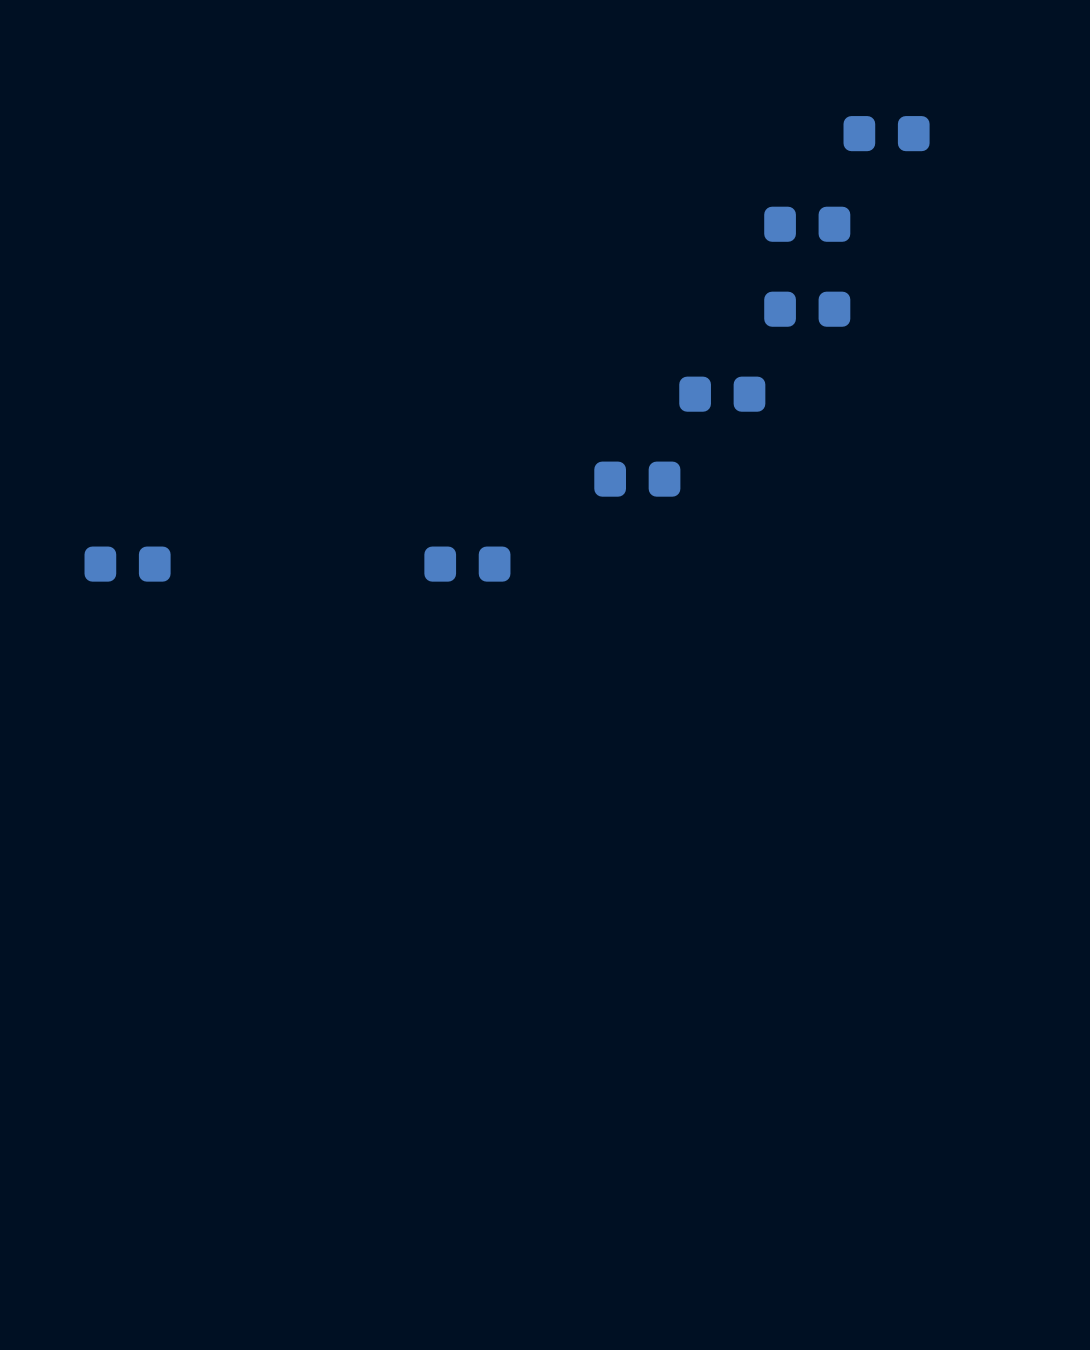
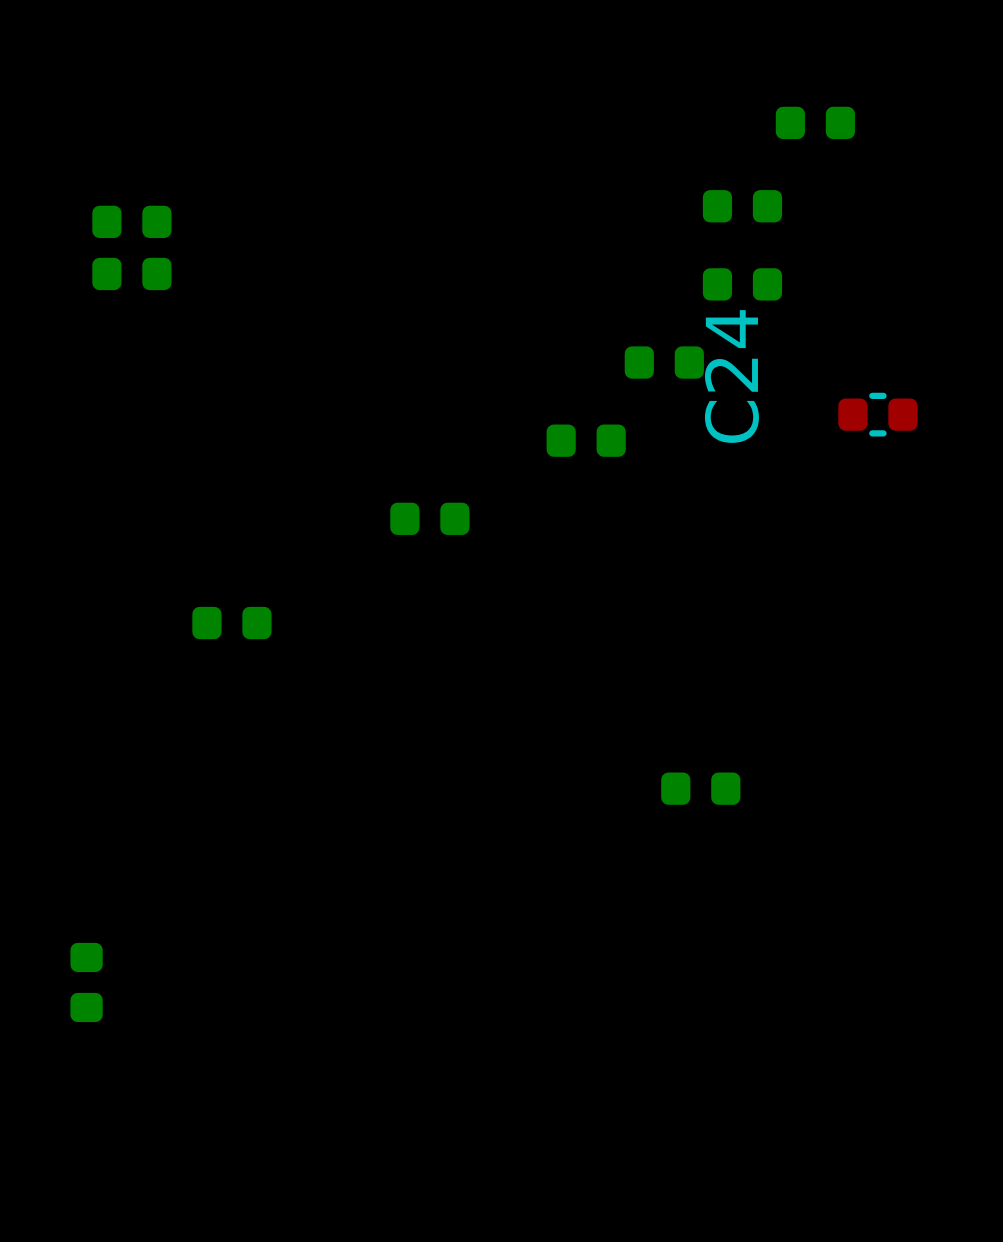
part: none -> (131, 221)
part: none -> (131, 273)
C24: none -> (877, 414)
part: (127, 564) -> none
part: none -> (231, 623)
part: none -> (700, 788)
part: none -> (86, 982)

